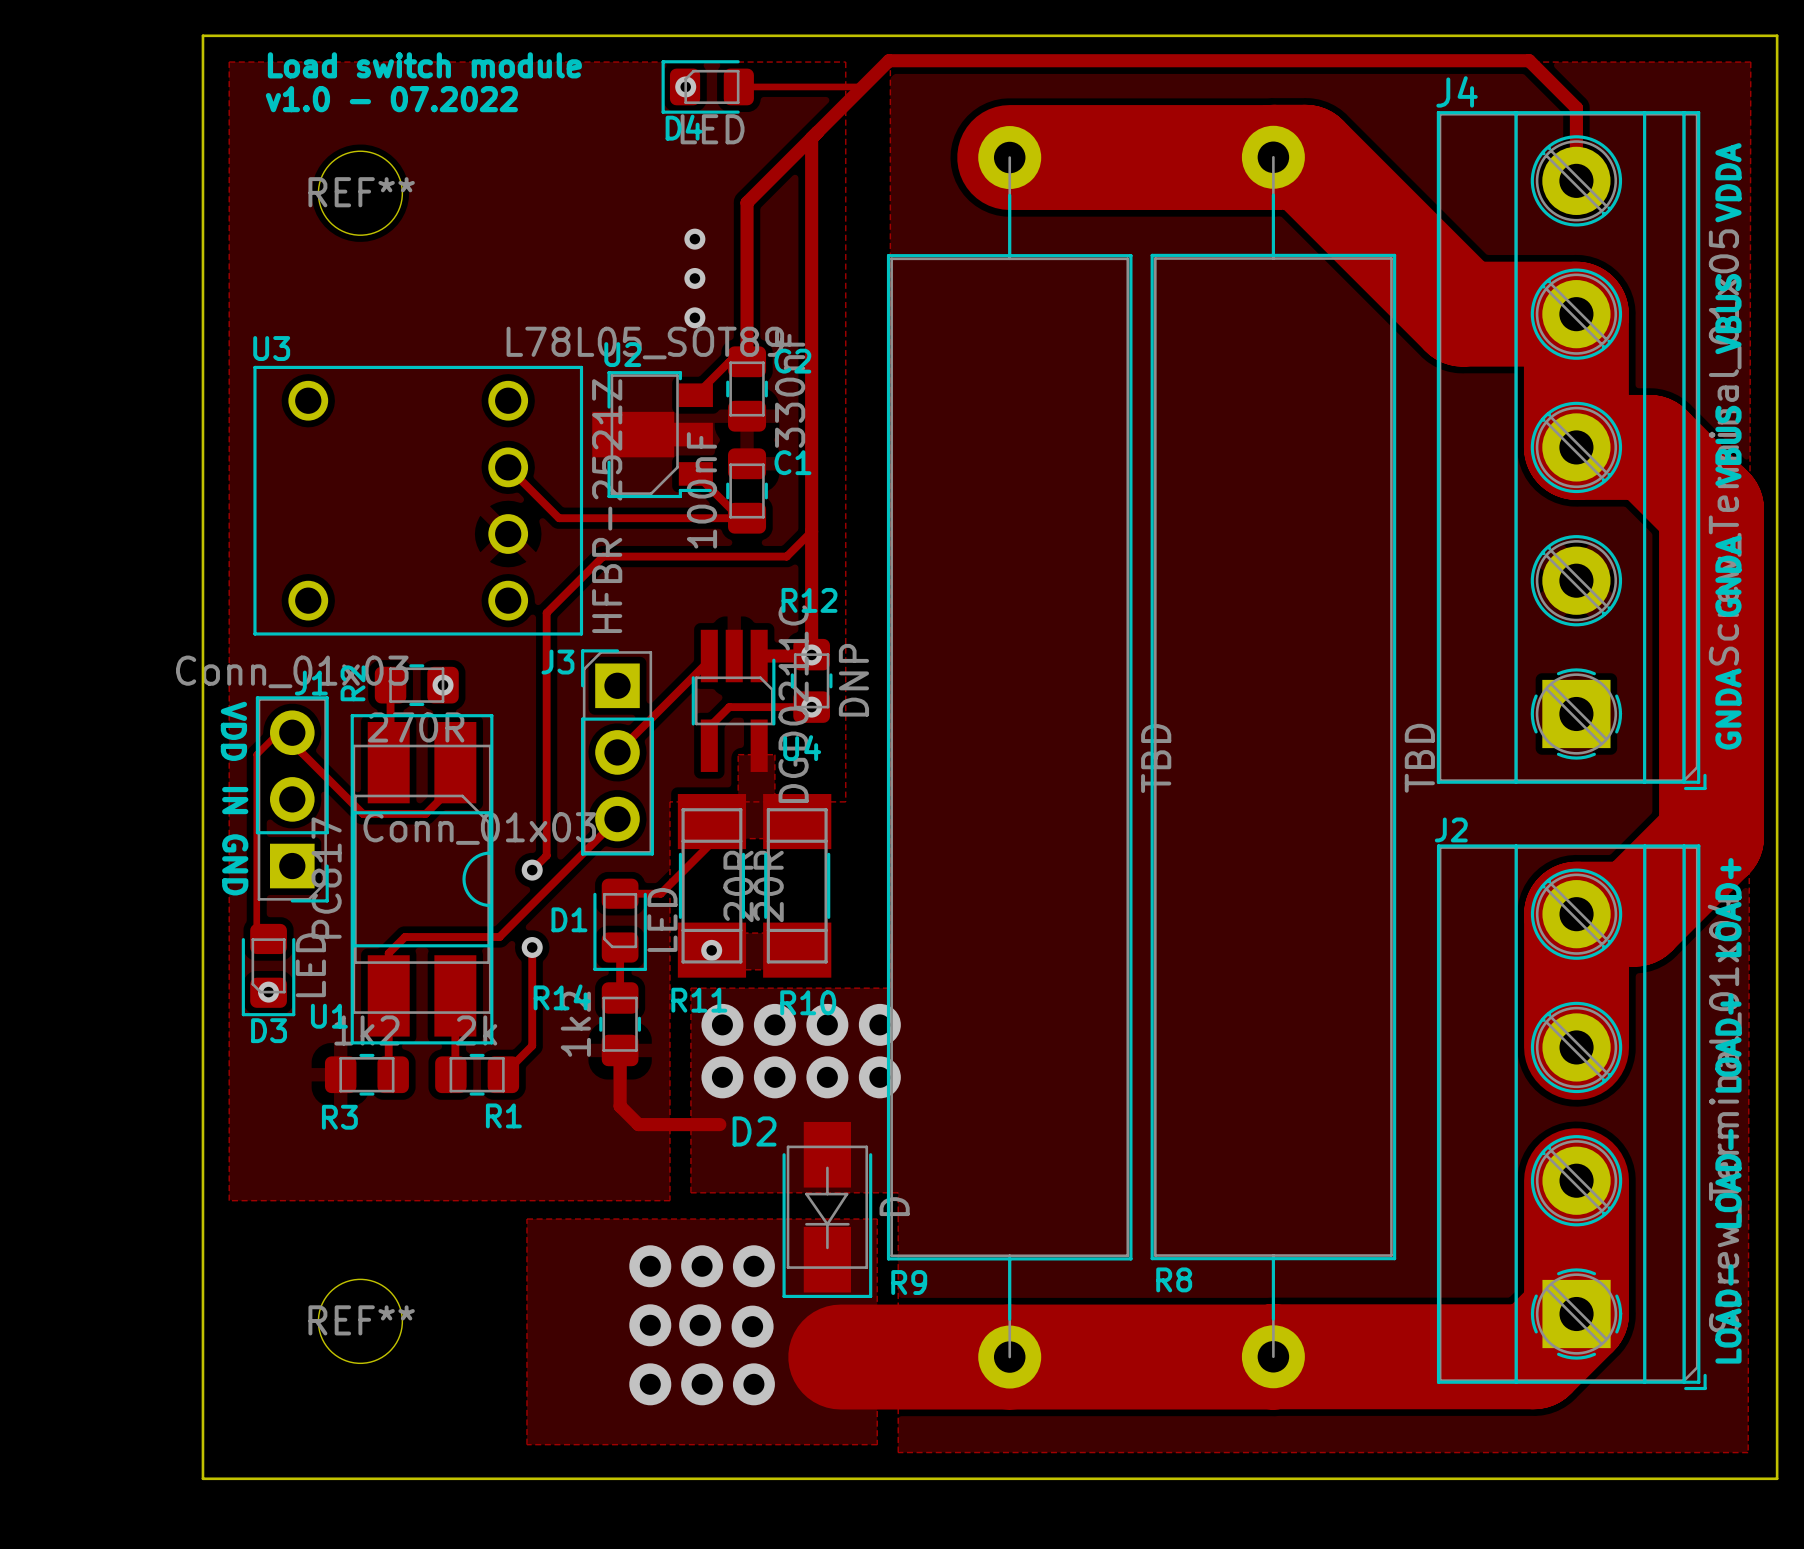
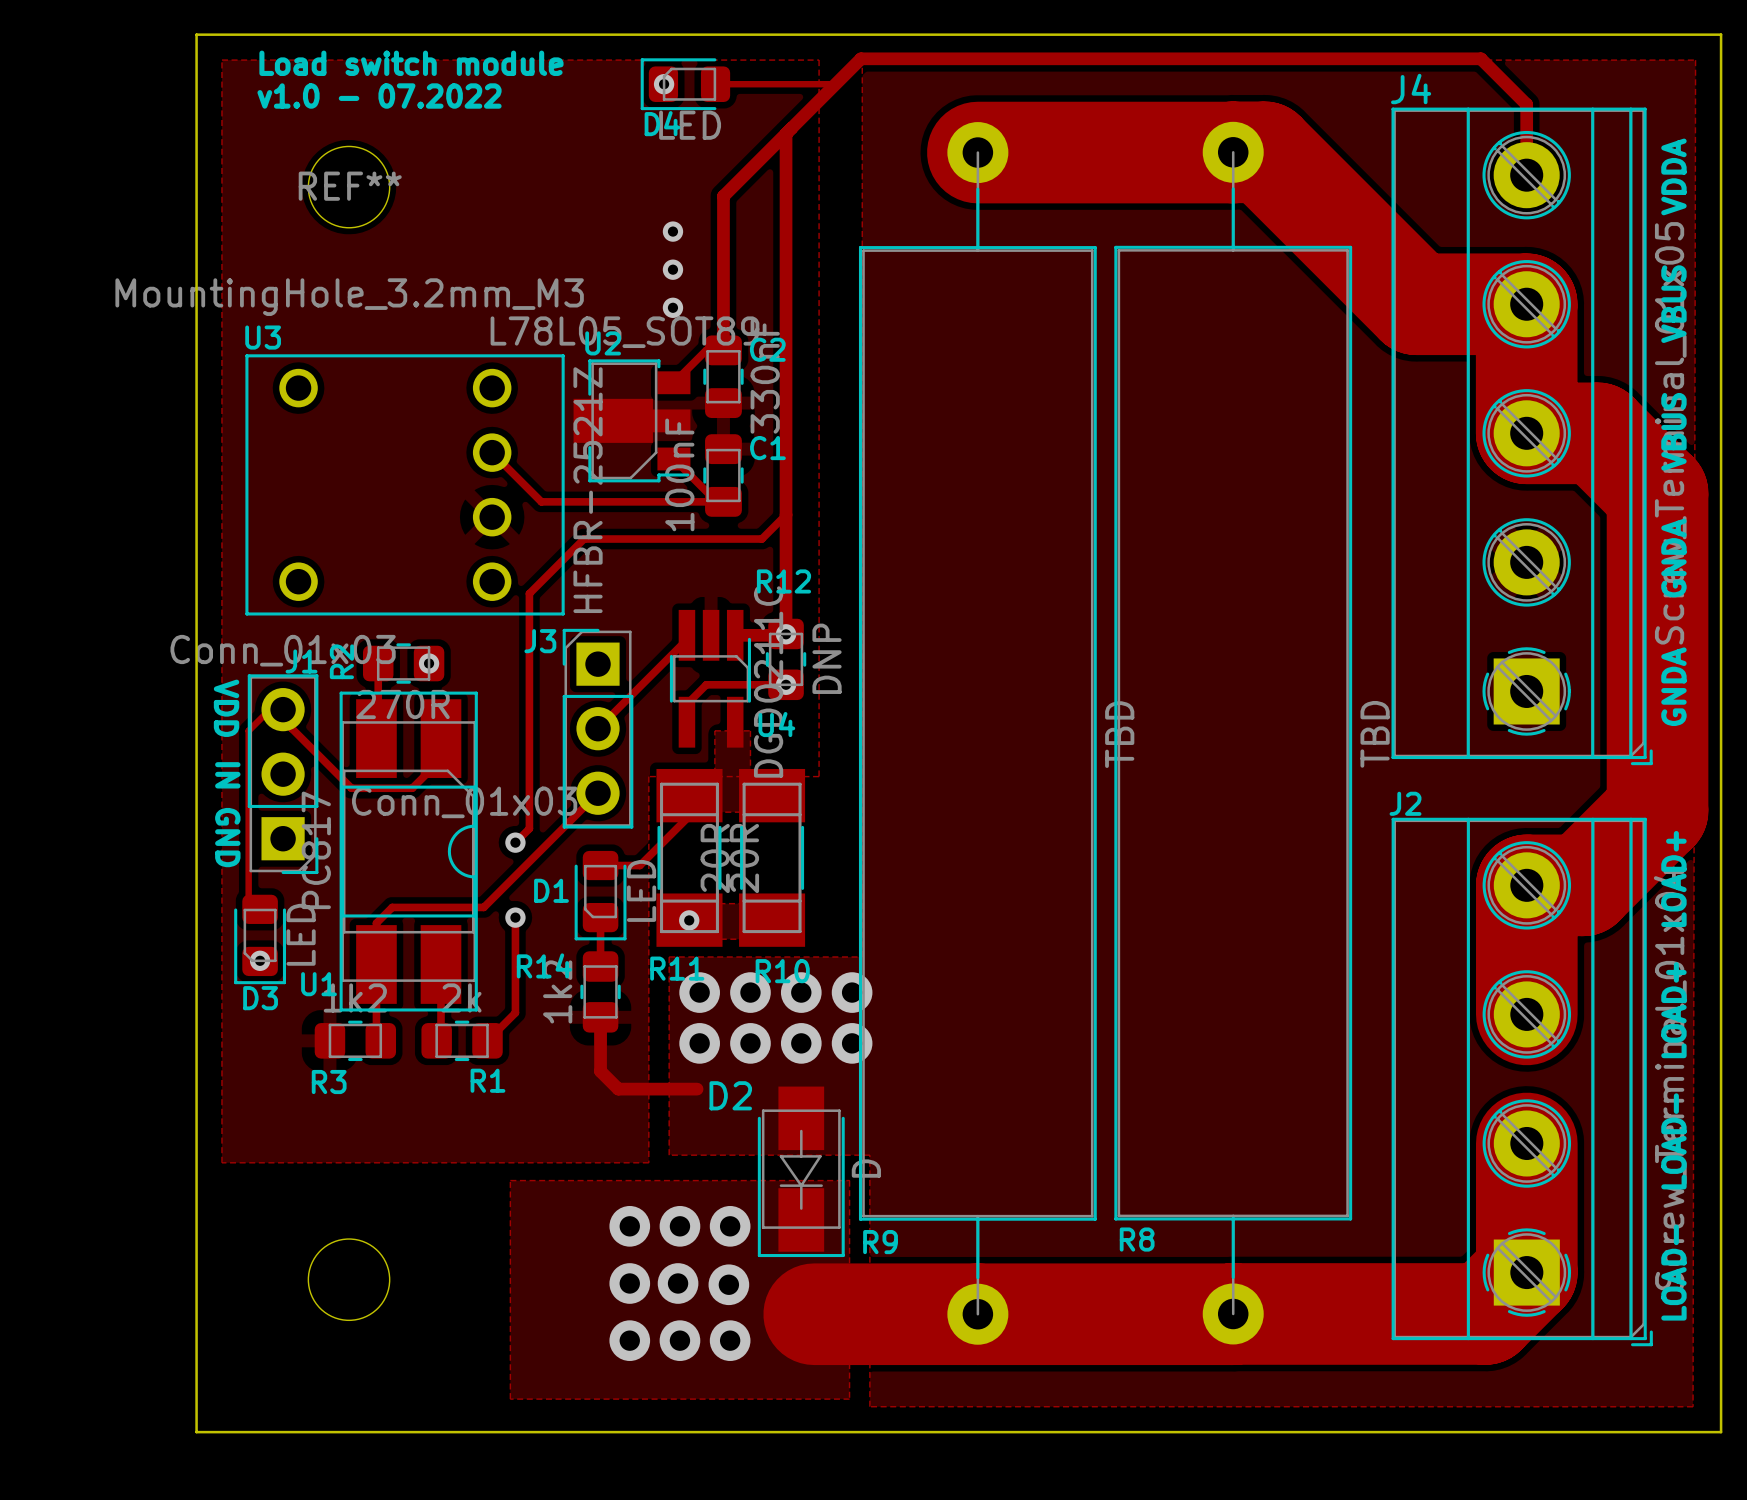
REF** value: none -> MountingHole_3.2mm_M3 (349, 297)
REF** name: REF** (361, 1320) -> none

